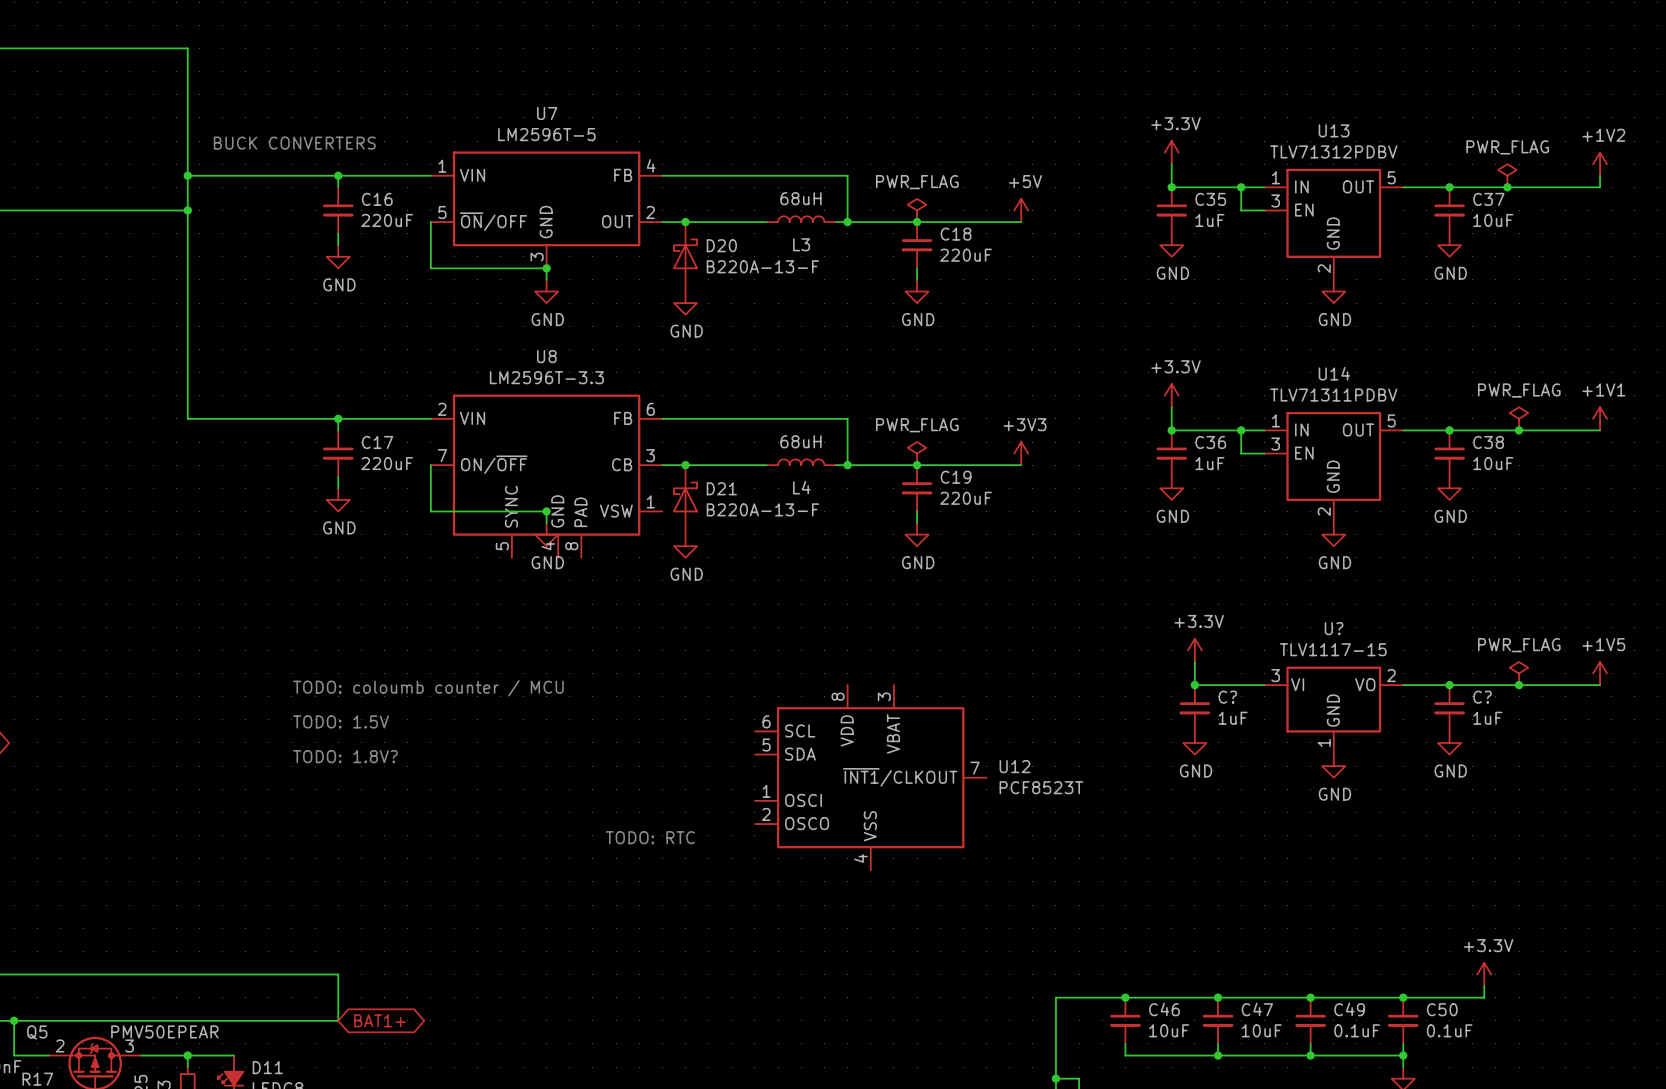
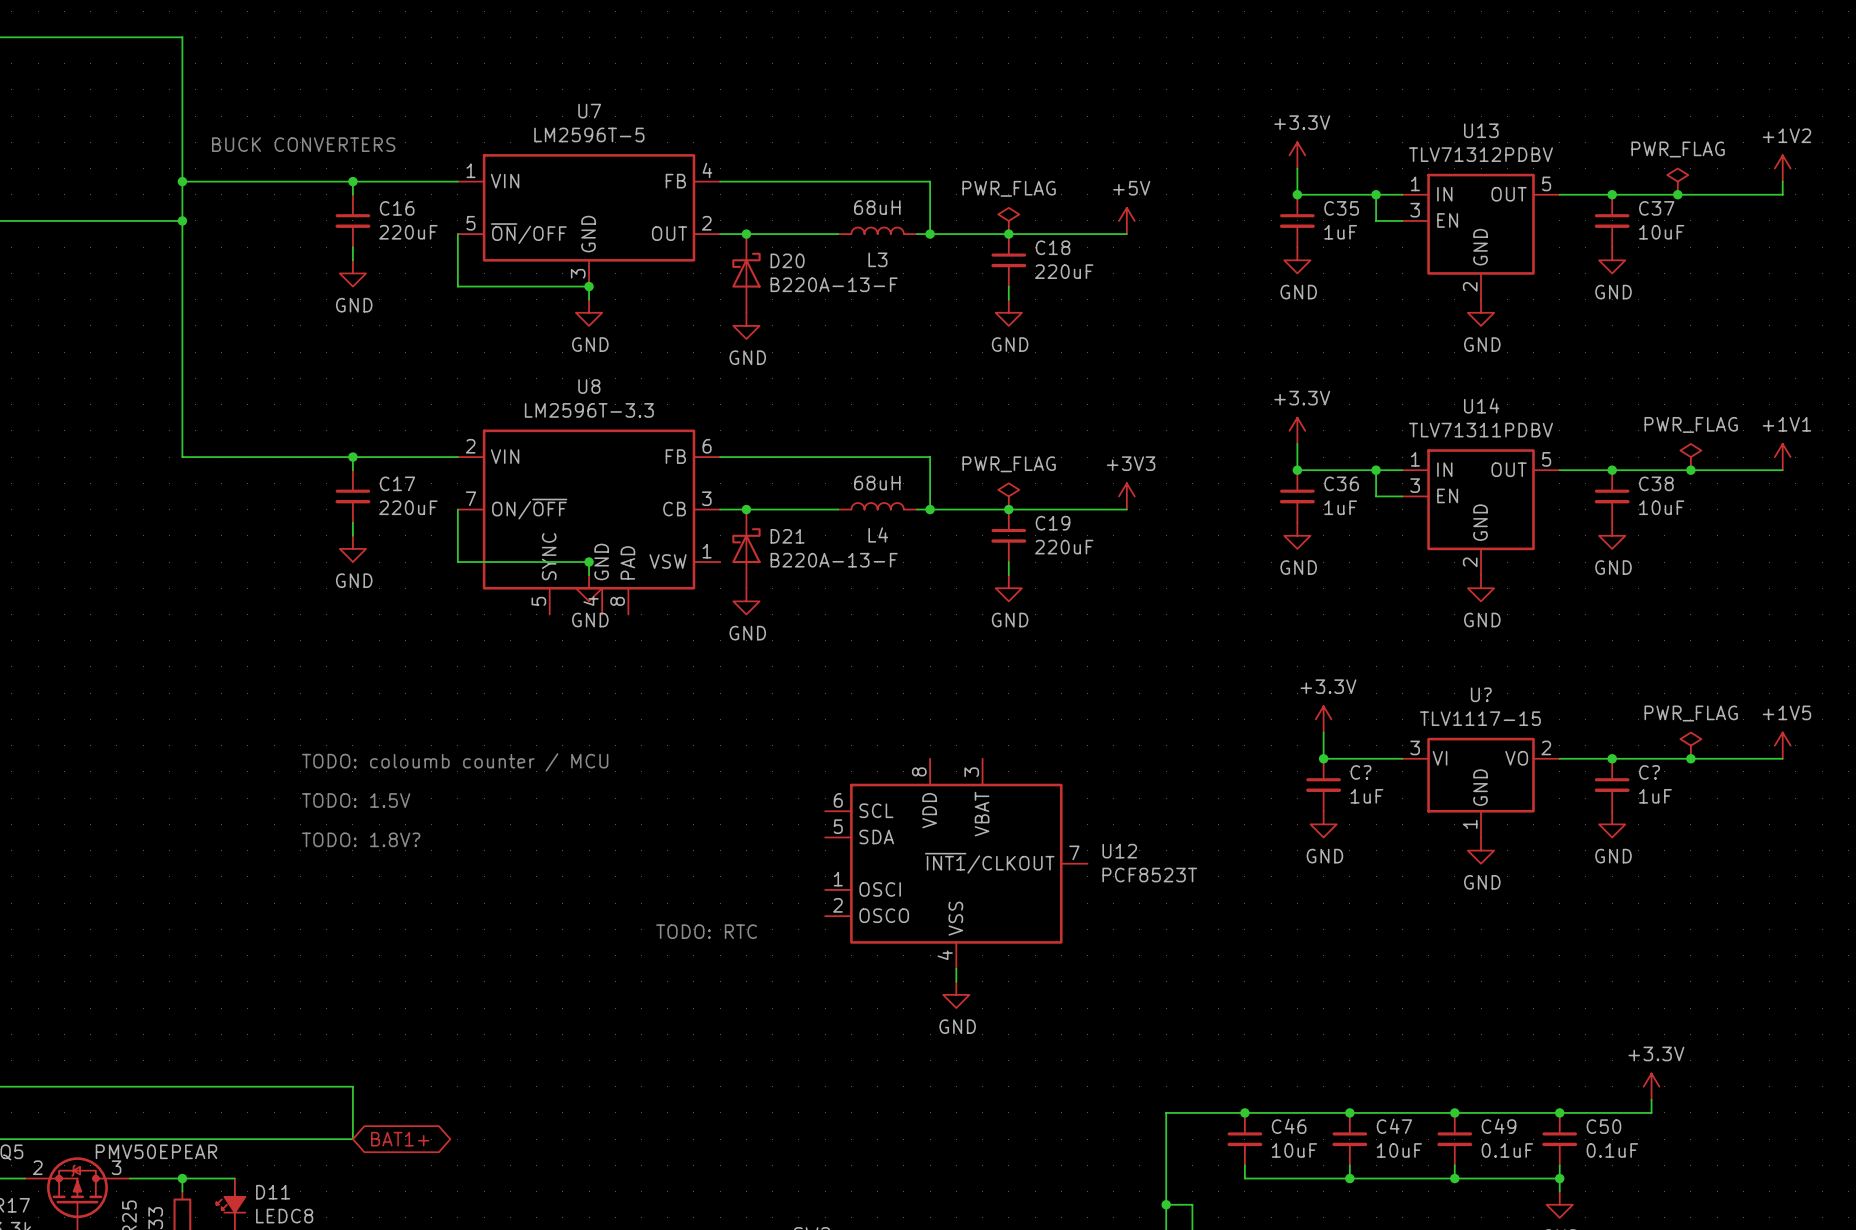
wire: none -> (956, 968) (956, 981)
power symbol: none -> GND (956, 994)

